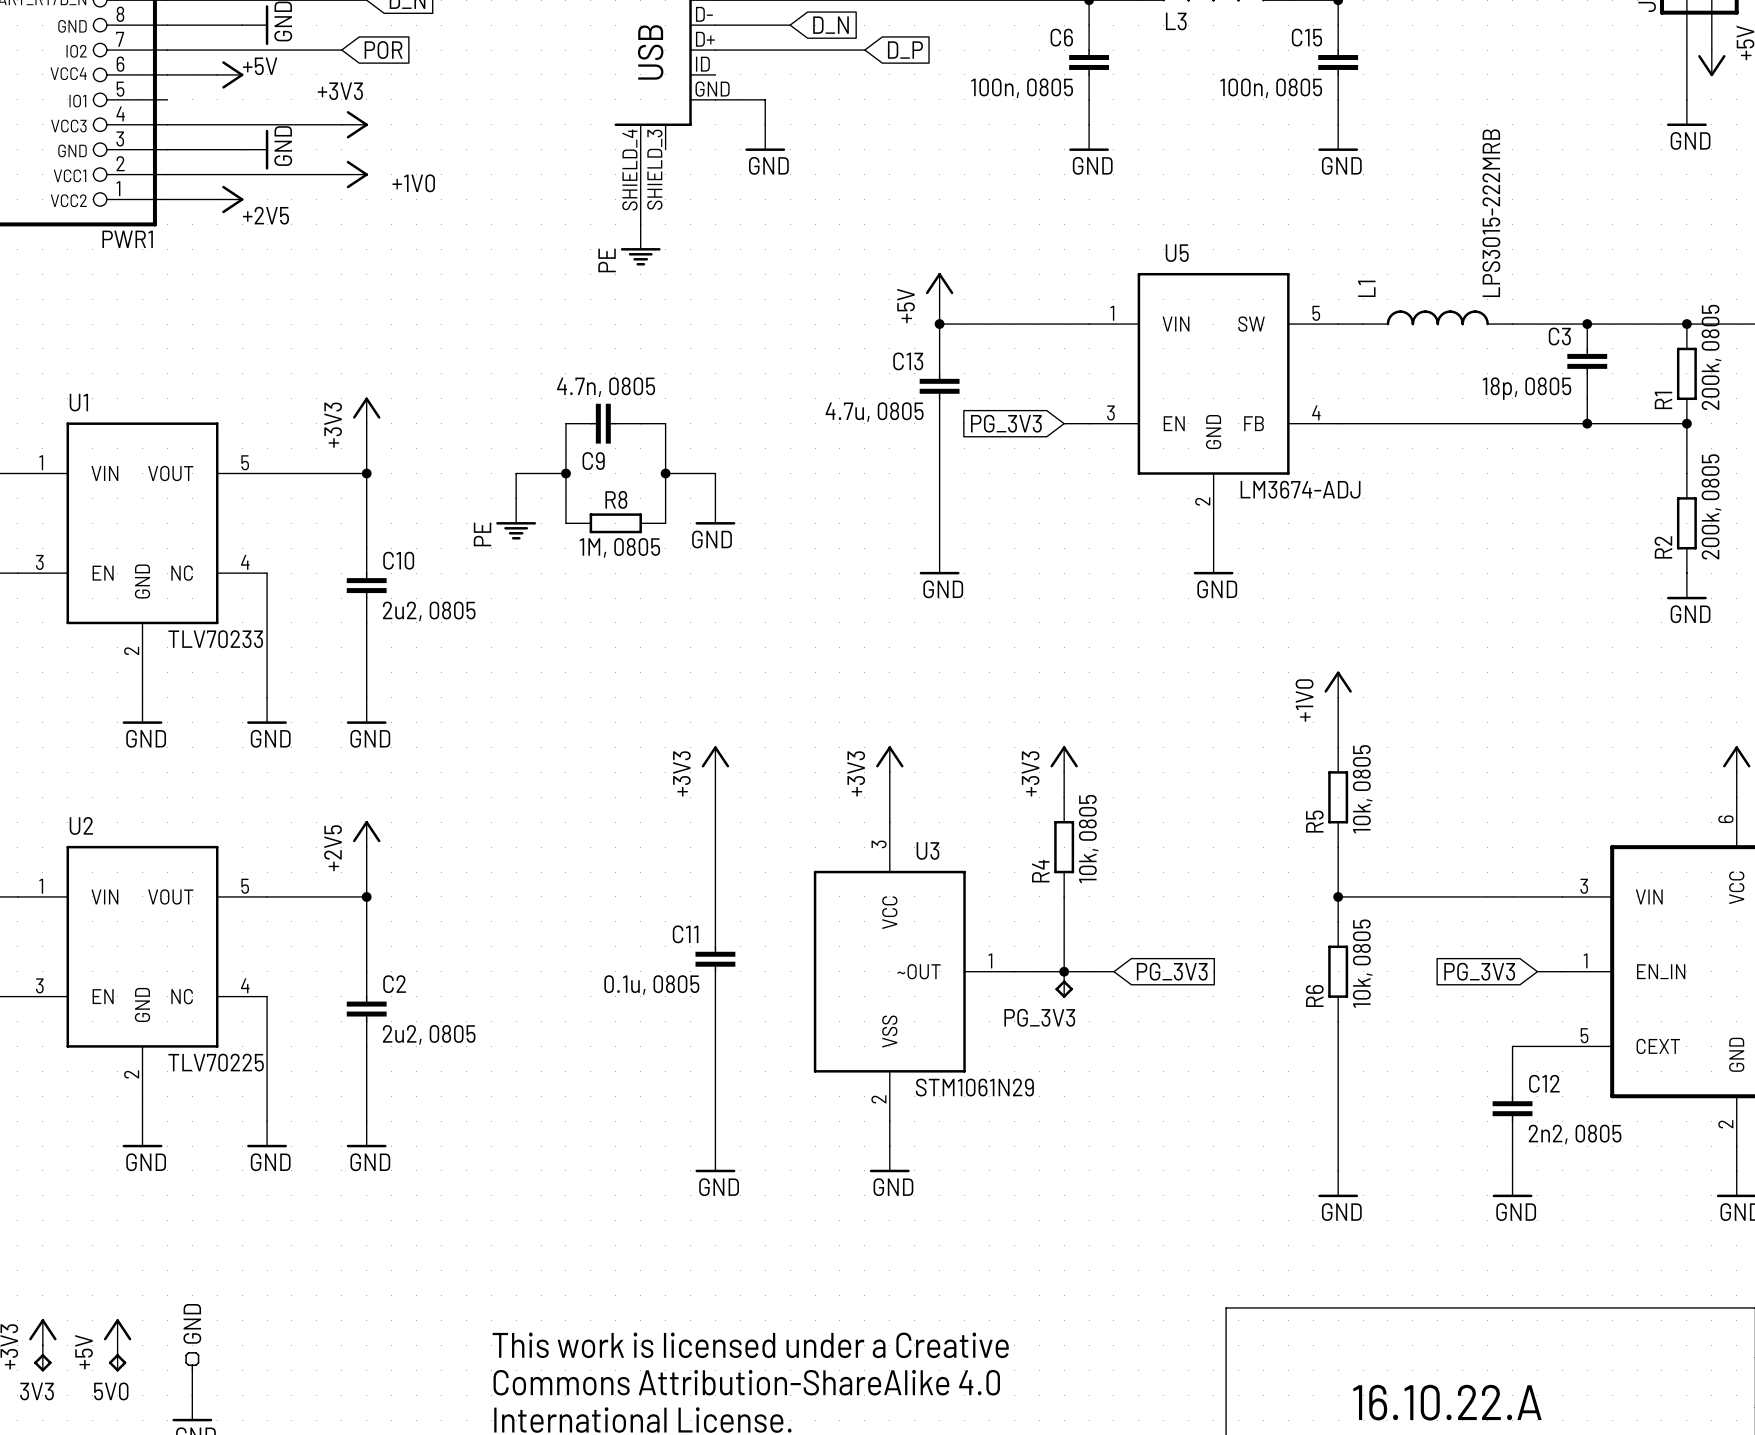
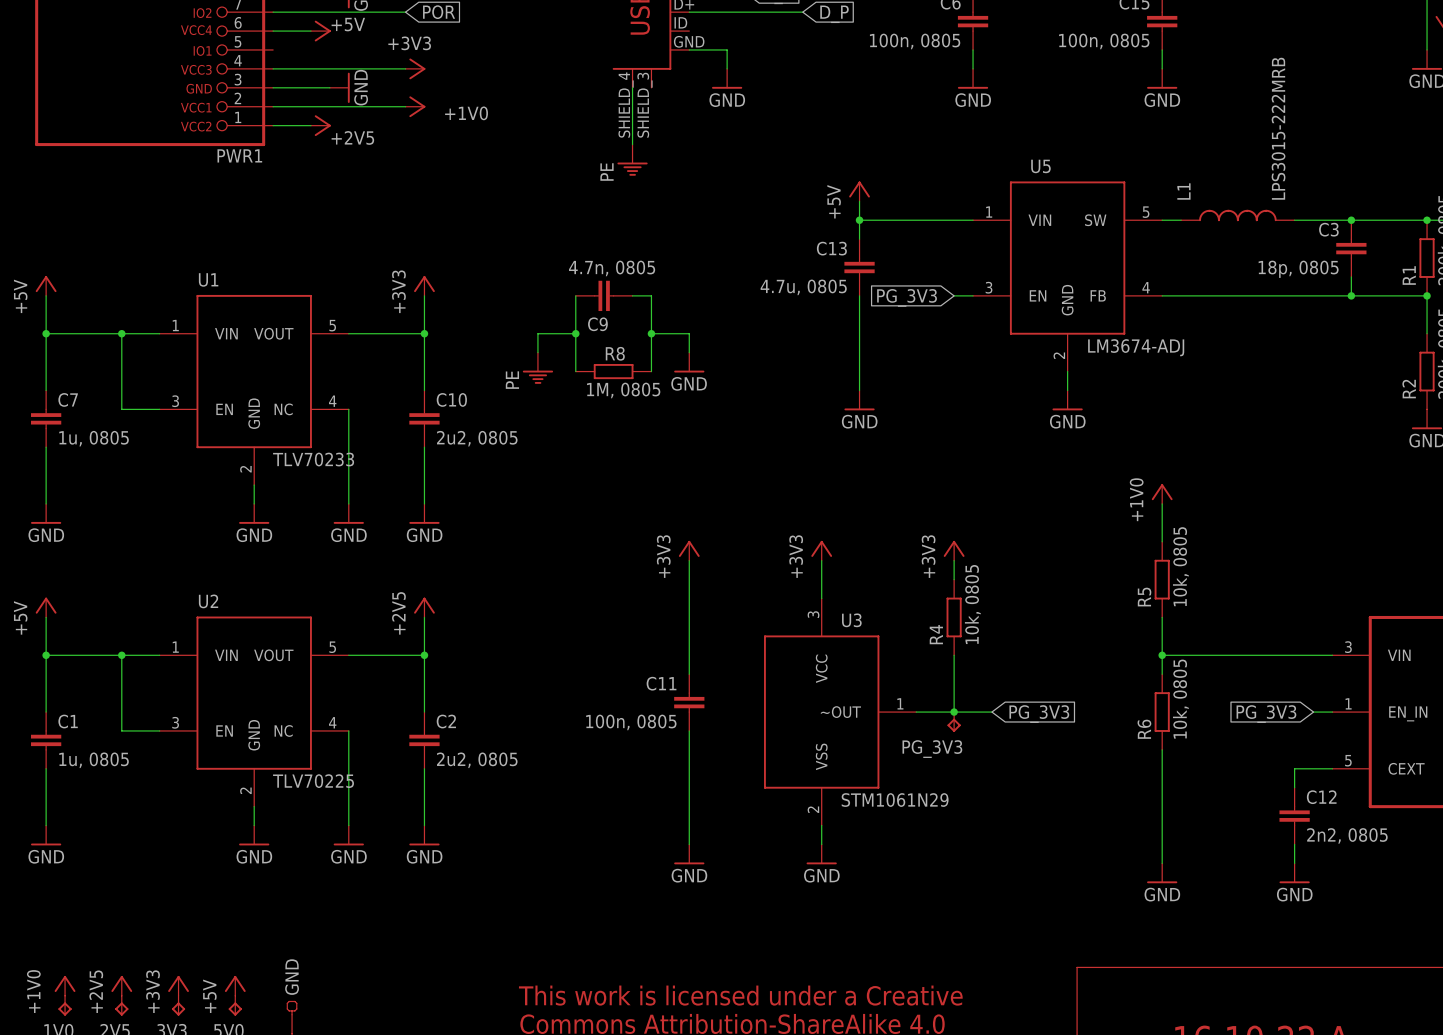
C11 value: 0.1u, 0805 (651, 985) -> 100n, 0805 (631, 722)

